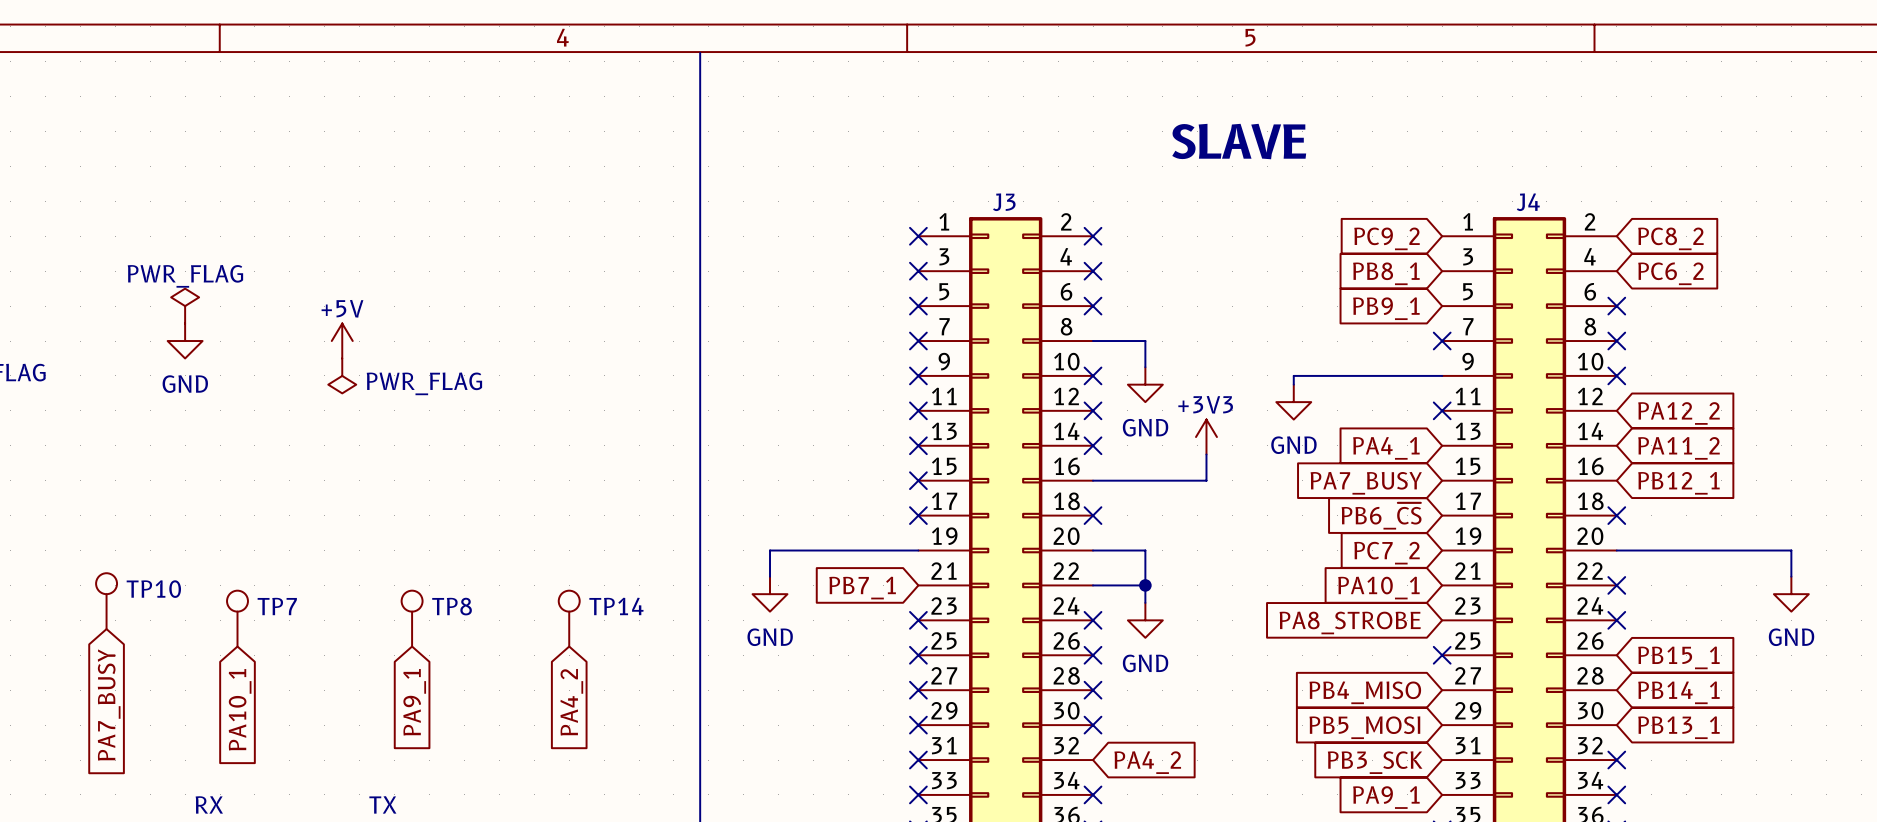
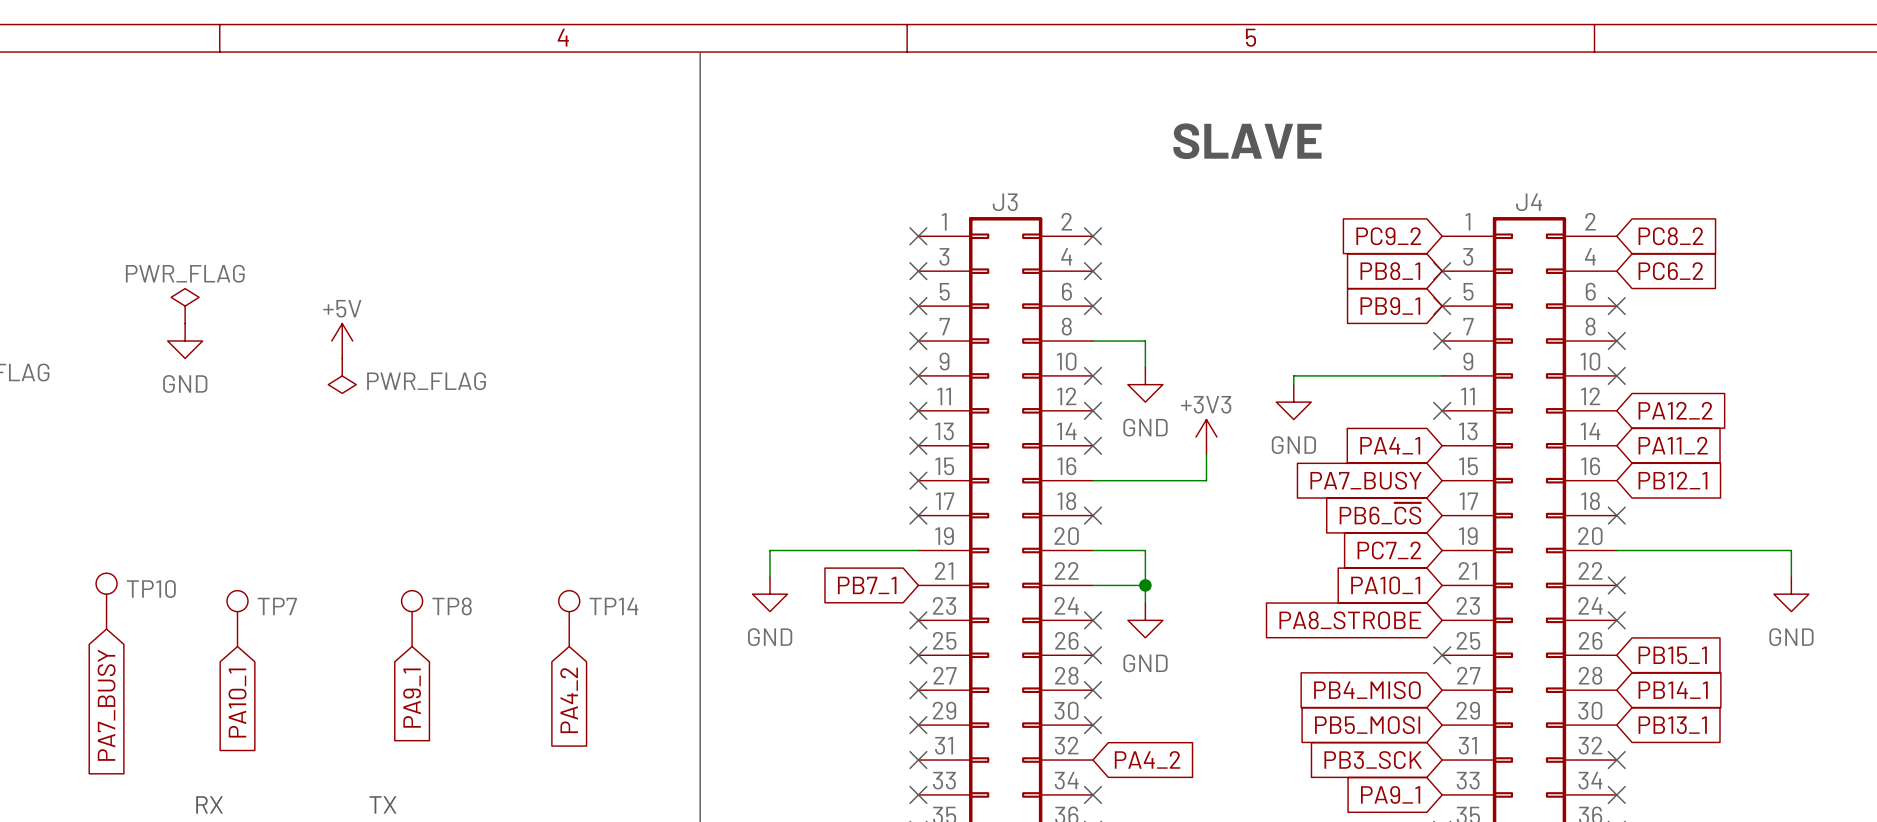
no-connect mark: none -> (1442, 271)
no-connect mark: none -> (1442, 306)

